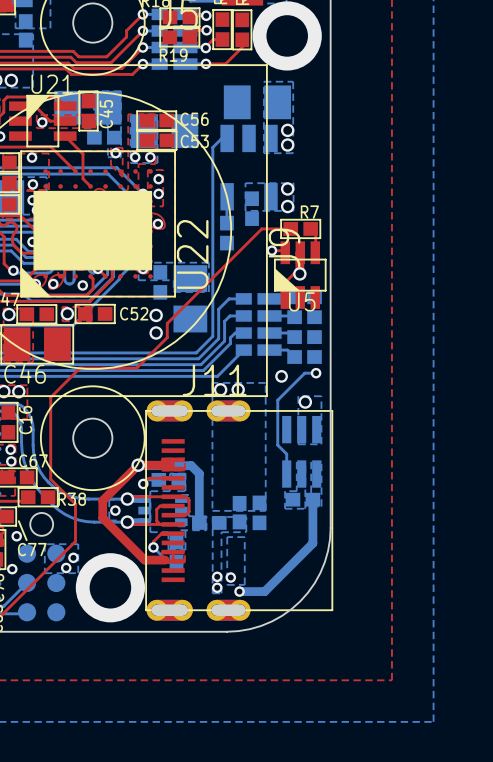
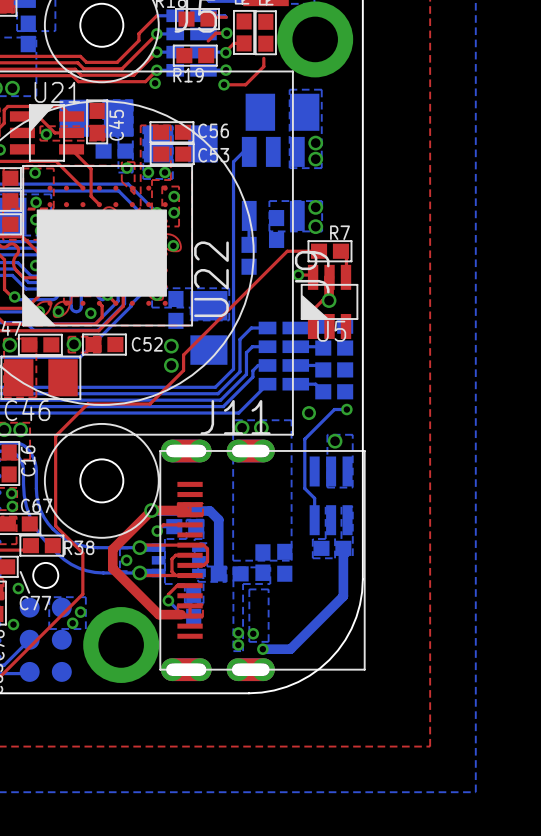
via: (142, 14) -> none
via: (206, 15) -> none
R19 position: (179, 37) -> (195, 55)
top track: (242, 39) (242, 47) (225, 63) (205, 63) -> (263, 58) (263, 66) (245, 84) (224, 84)
via: none -> (155, 83)
via: none -> (224, 84)

